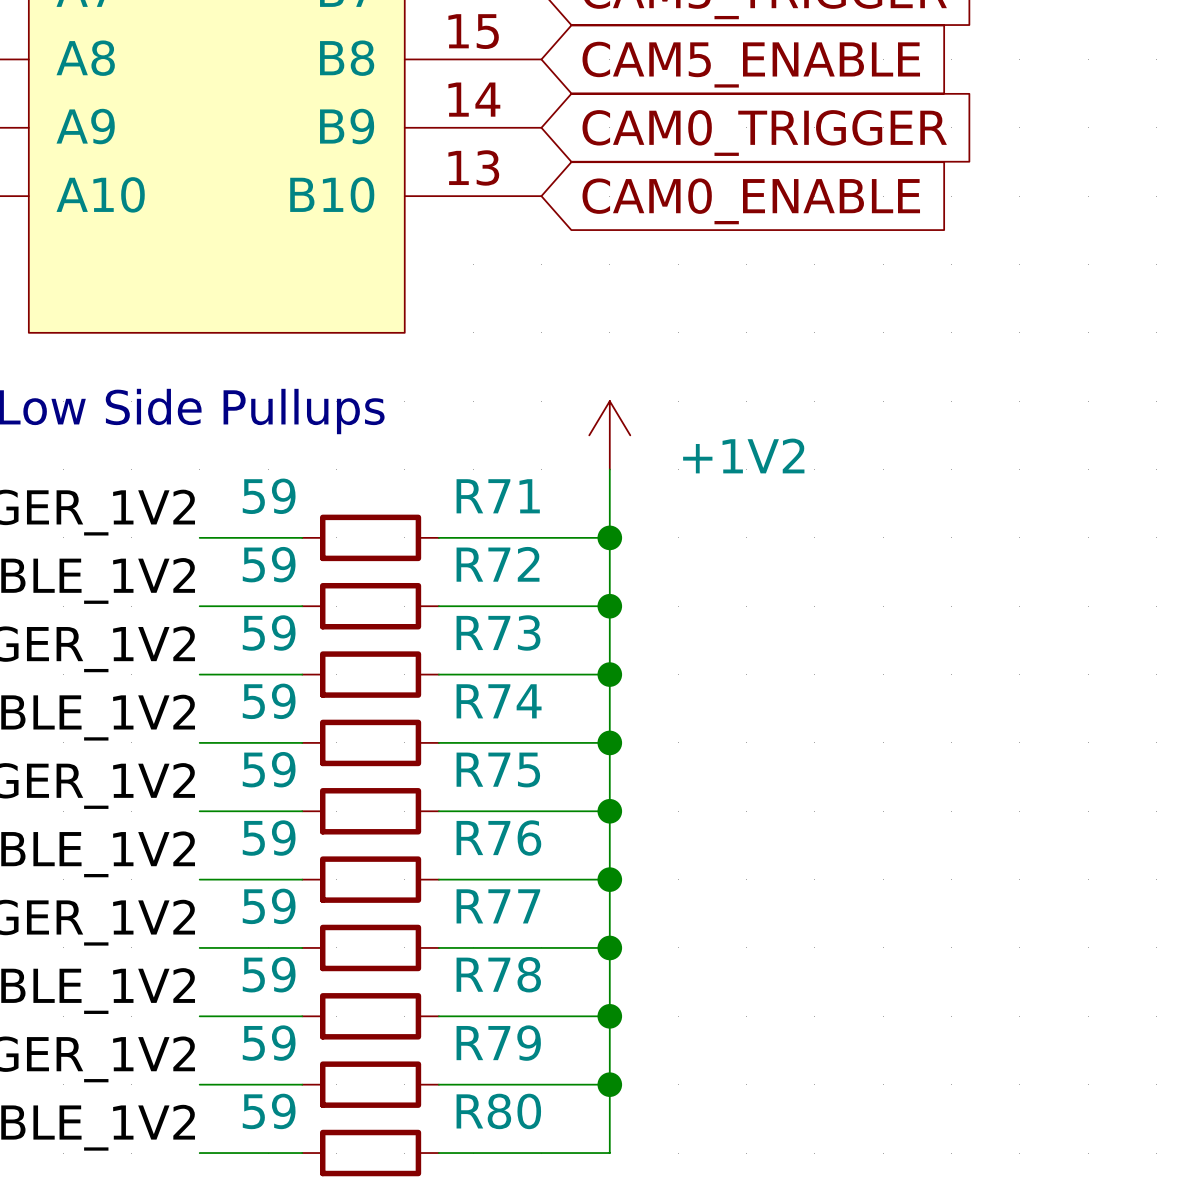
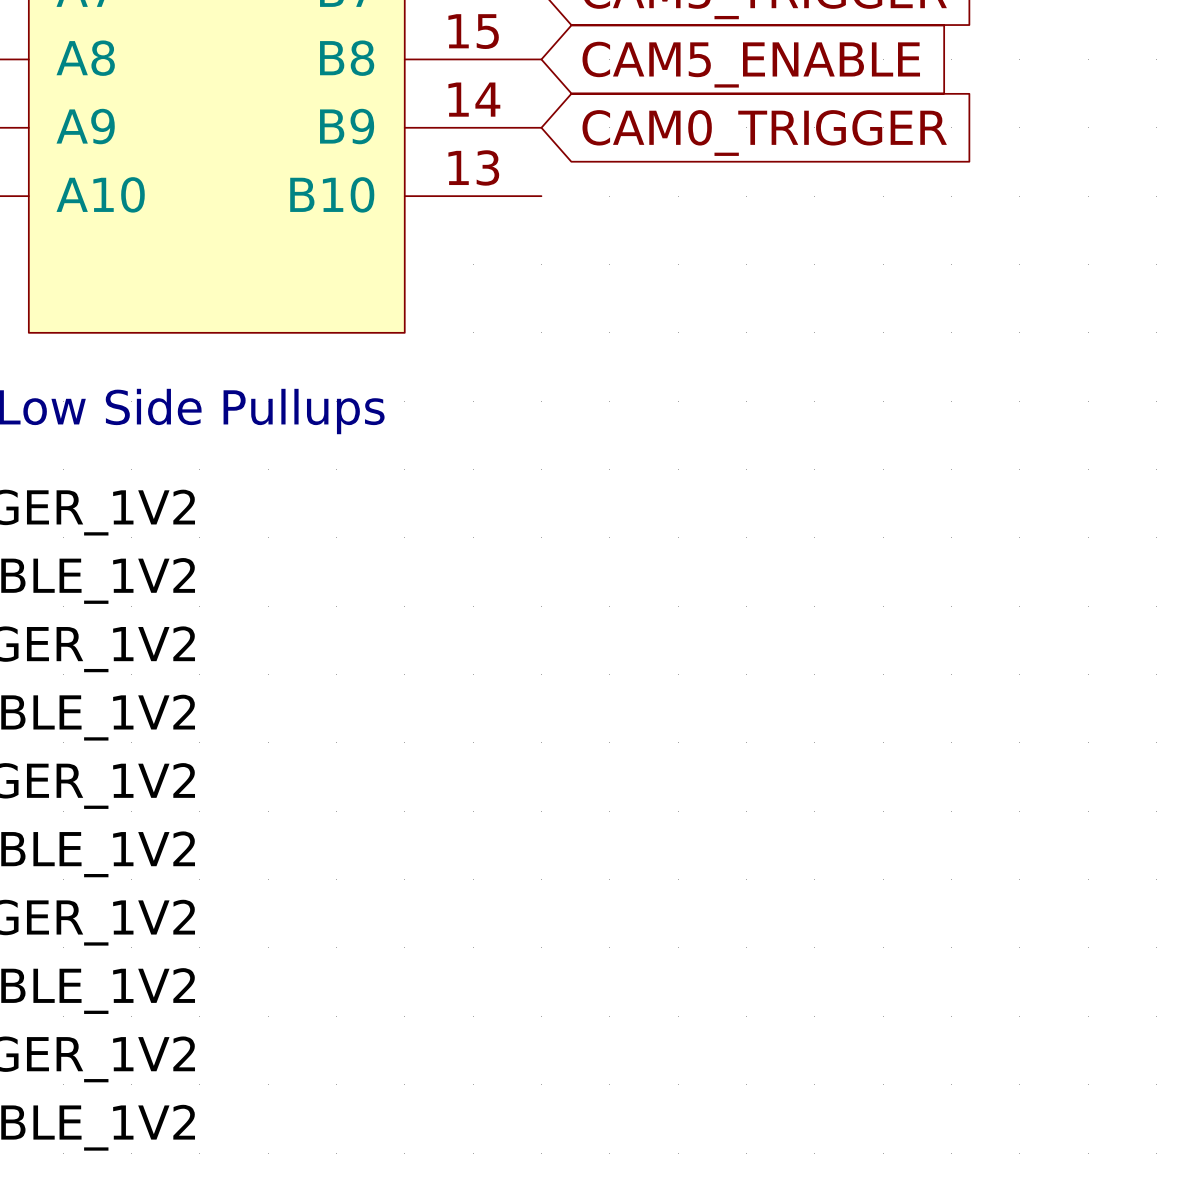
global label: CAM0_ENABLE (751, 201) -> none
power symbol: +1V2 (609, 435) -> none
wire: (609, 469) (609, 1153) (438, 1153) -> none
wire: (199, 537) (302, 537) -> none
R71: 59 (370, 537) -> none
wire: (438, 537) (609, 537) -> none
junction: (609, 537) -> none
wire: (199, 606) (302, 606) -> none
R72: 59 (370, 606) -> none
wire: (438, 606) (609, 606) -> none
junction: (609, 606) -> none
wire: (199, 674) (302, 674) -> none
R73: 59 (370, 674) -> none
wire: (438, 674) (609, 674) -> none
junction: (609, 674) -> none
wire: (199, 742) (302, 742) -> none
R74: 59 (370, 742) -> none
wire: (438, 742) (609, 742) -> none
junction: (609, 742) -> none
wire: (199, 811) (302, 811) -> none
R75: 59 (370, 811) -> none
wire: (438, 811) (609, 811) -> none
junction: (609, 811) -> none
wire: (199, 879) (302, 879) -> none
R76: 59 (370, 879) -> none
wire: (438, 879) (609, 879) -> none
junction: (609, 879) -> none
wire: (199, 947) (302, 947) -> none
R77: 59 (370, 947) -> none
wire: (438, 947) (609, 947) -> none
junction: (609, 947) -> none
wire: (199, 1016) (302, 1016) -> none
R78: 59 (370, 1016) -> none
wire: (438, 1016) (609, 1016) -> none
junction: (609, 1016) -> none
wire: (199, 1084) (302, 1084) -> none
R79: 59 (370, 1084) -> none
wire: (438, 1084) (609, 1084) -> none
junction: (609, 1084) -> none
wire: (199, 1153) (302, 1153) -> none
R80: 59 (370, 1153) -> none

